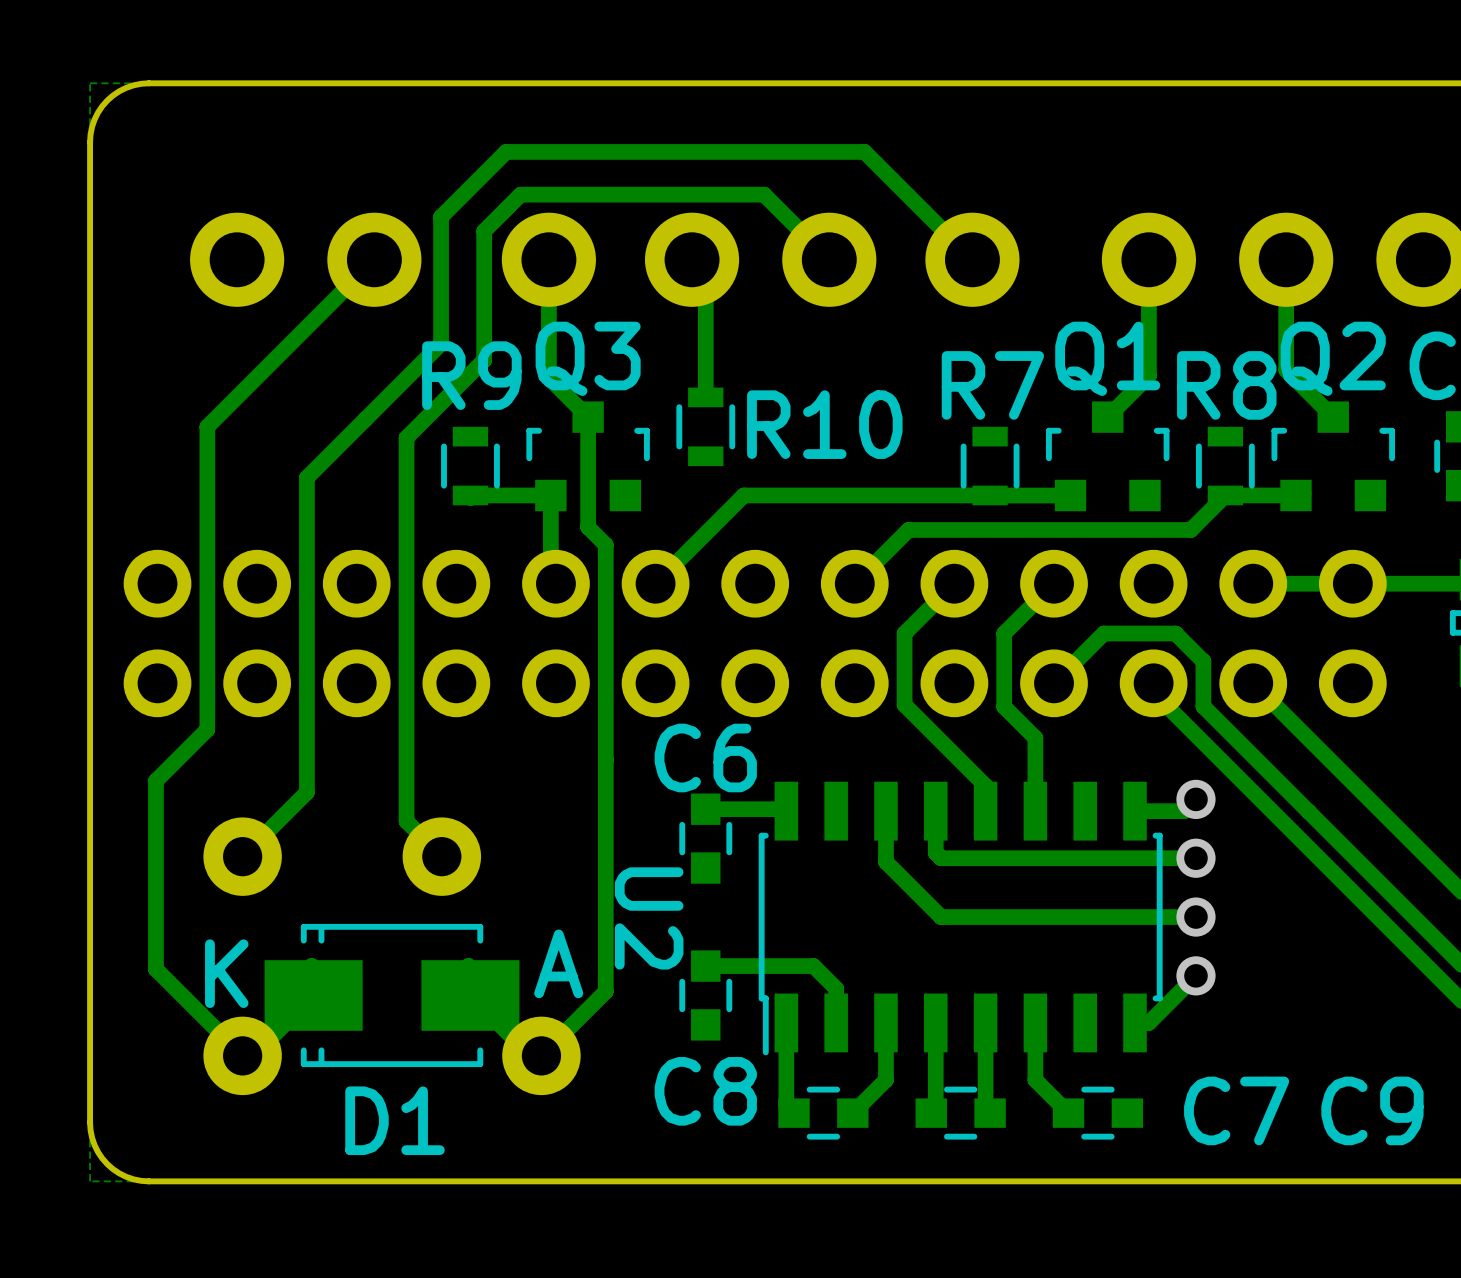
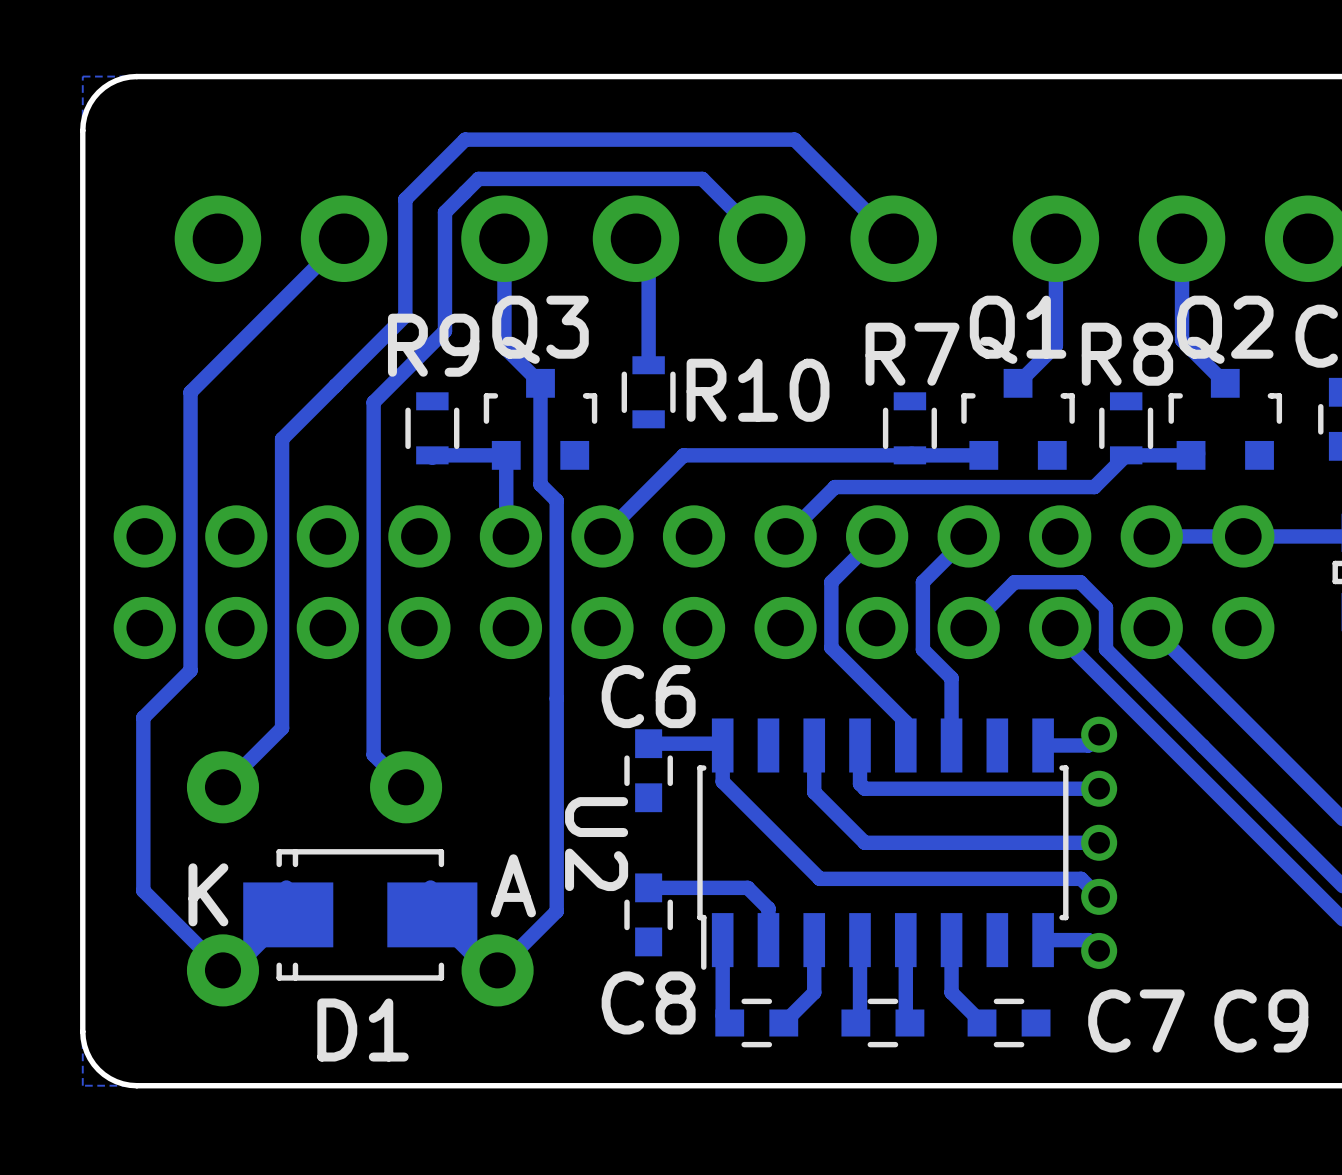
track: none -> (722, 745) (722, 781) (819, 878) (1081, 878) (1099, 896)
track: (1195, 975) (1148, 1022) -> (1099, 950) (1088, 940) (1055, 940)
via: none -> (1099, 950)

